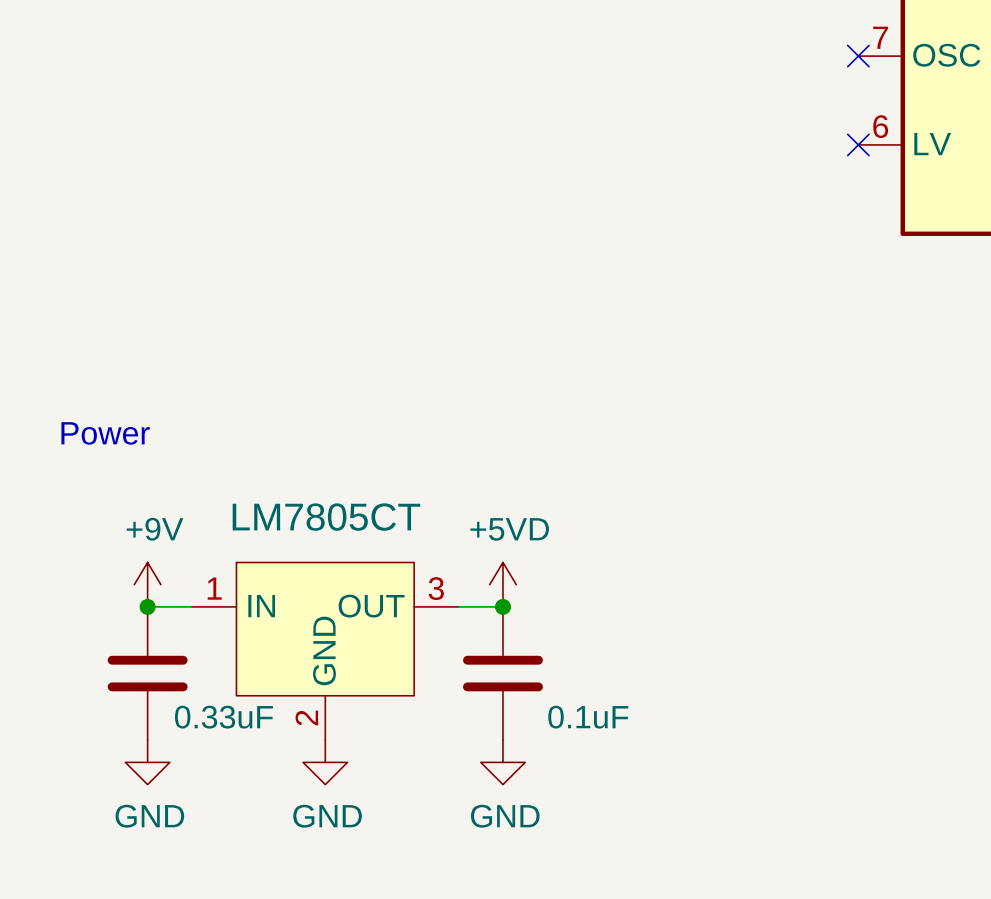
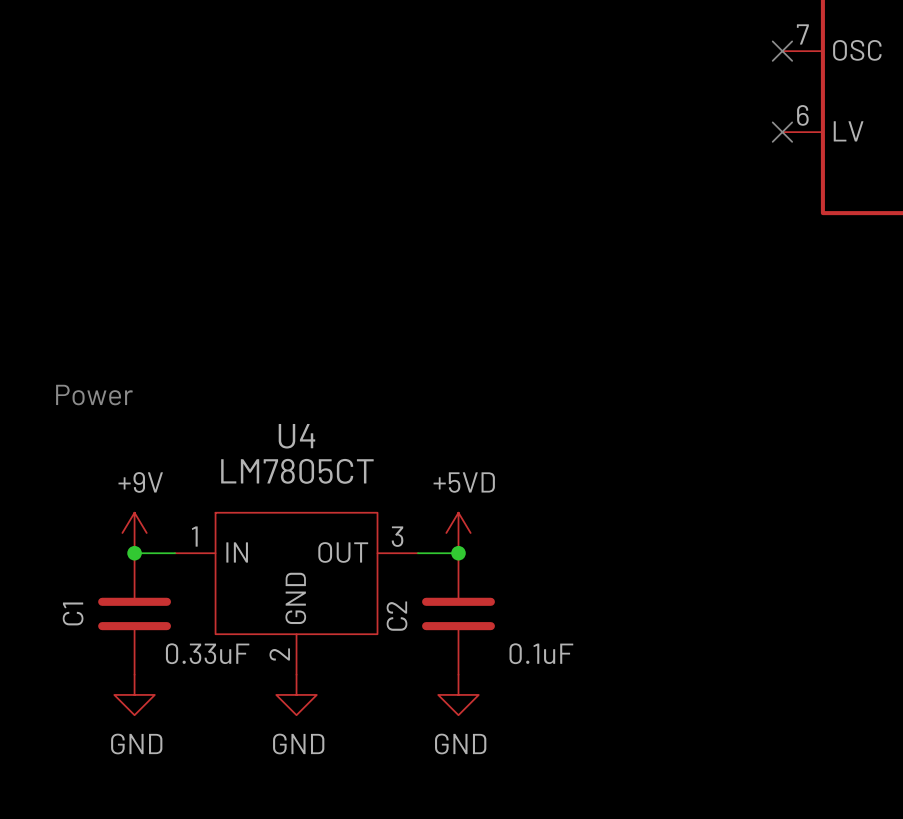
U4 name: none -> U4 (296, 436)
C1 name: none -> C1 (73, 613)
C2 name: none -> C2 (397, 616)

